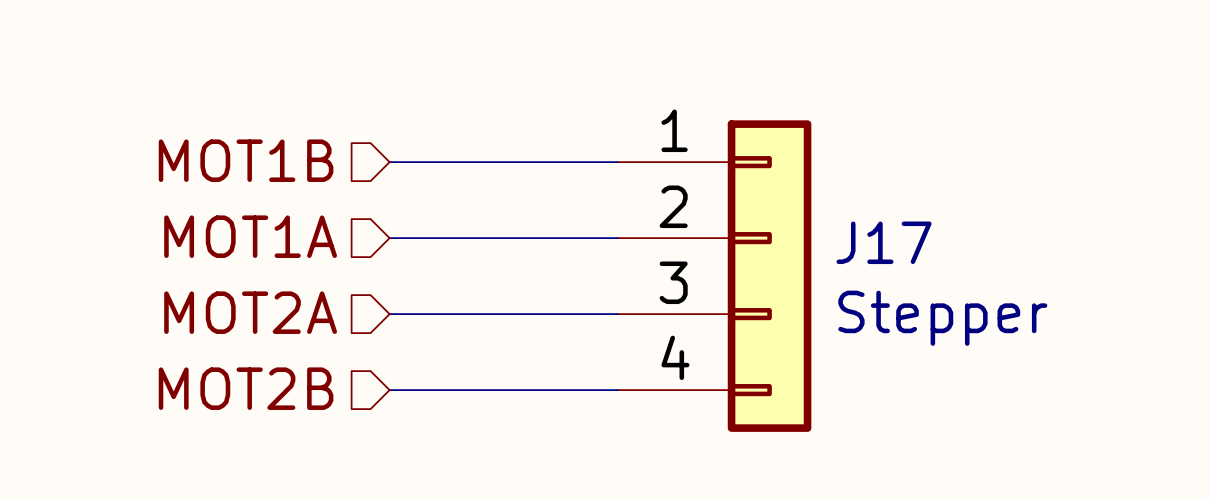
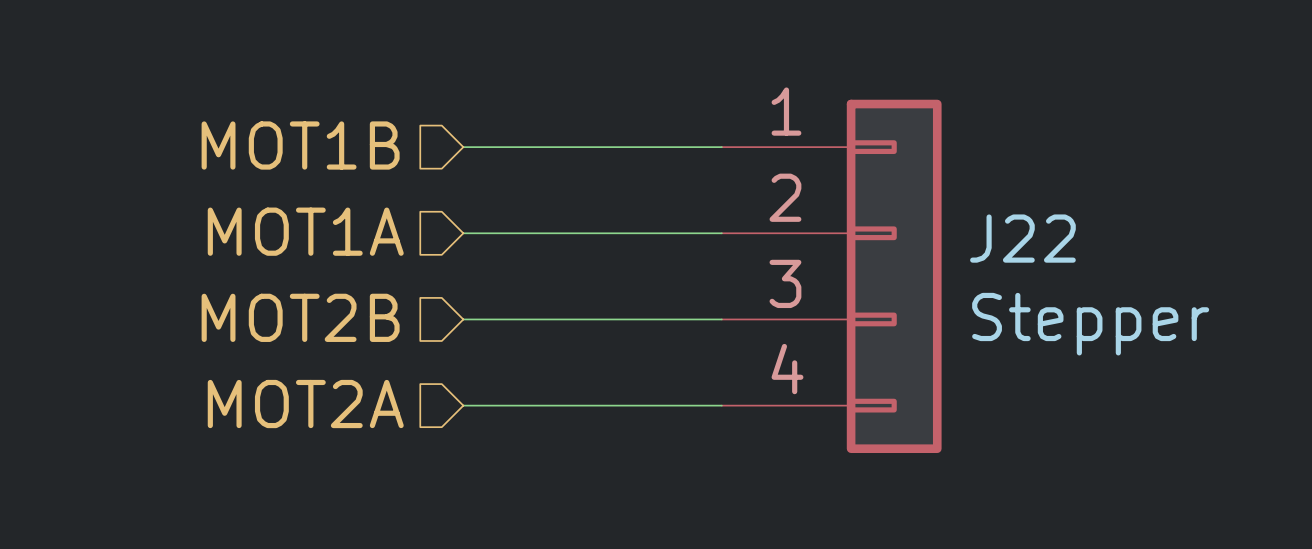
J17 name: J17 (884, 242) -> J22 (1022, 238)
hierarchical label: MOT2A (250, 312) -> MOT2B (300, 317)
hierarchical label: MOT2B (246, 388) -> MOT2A (305, 404)

